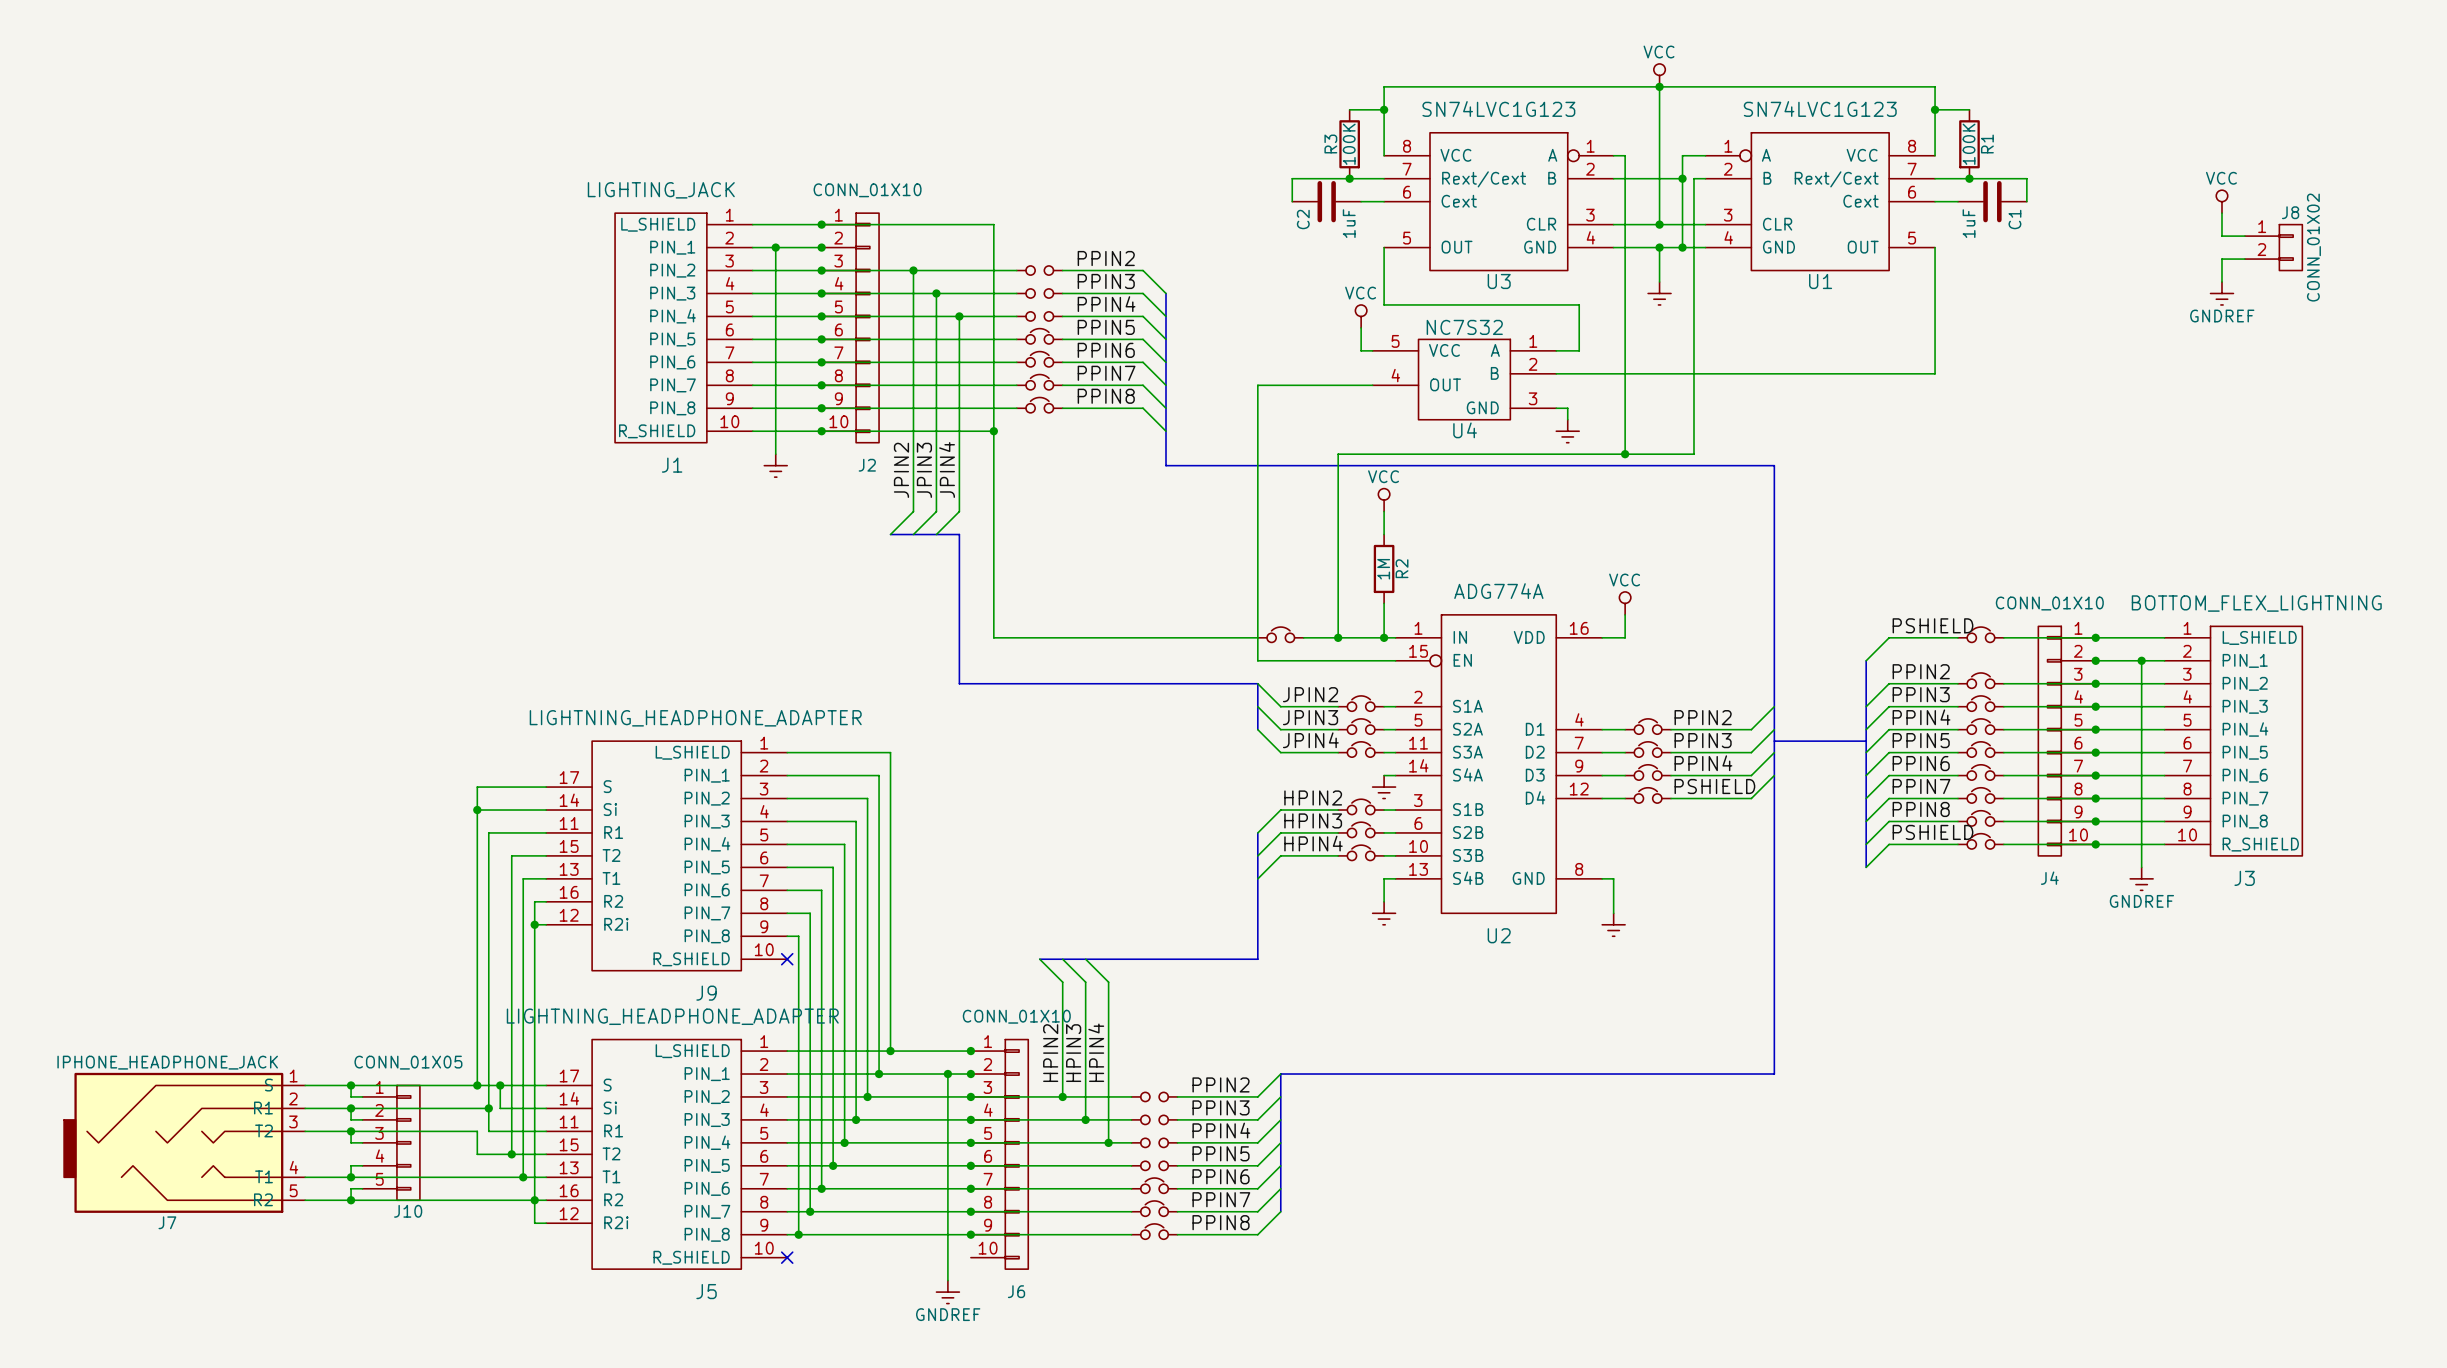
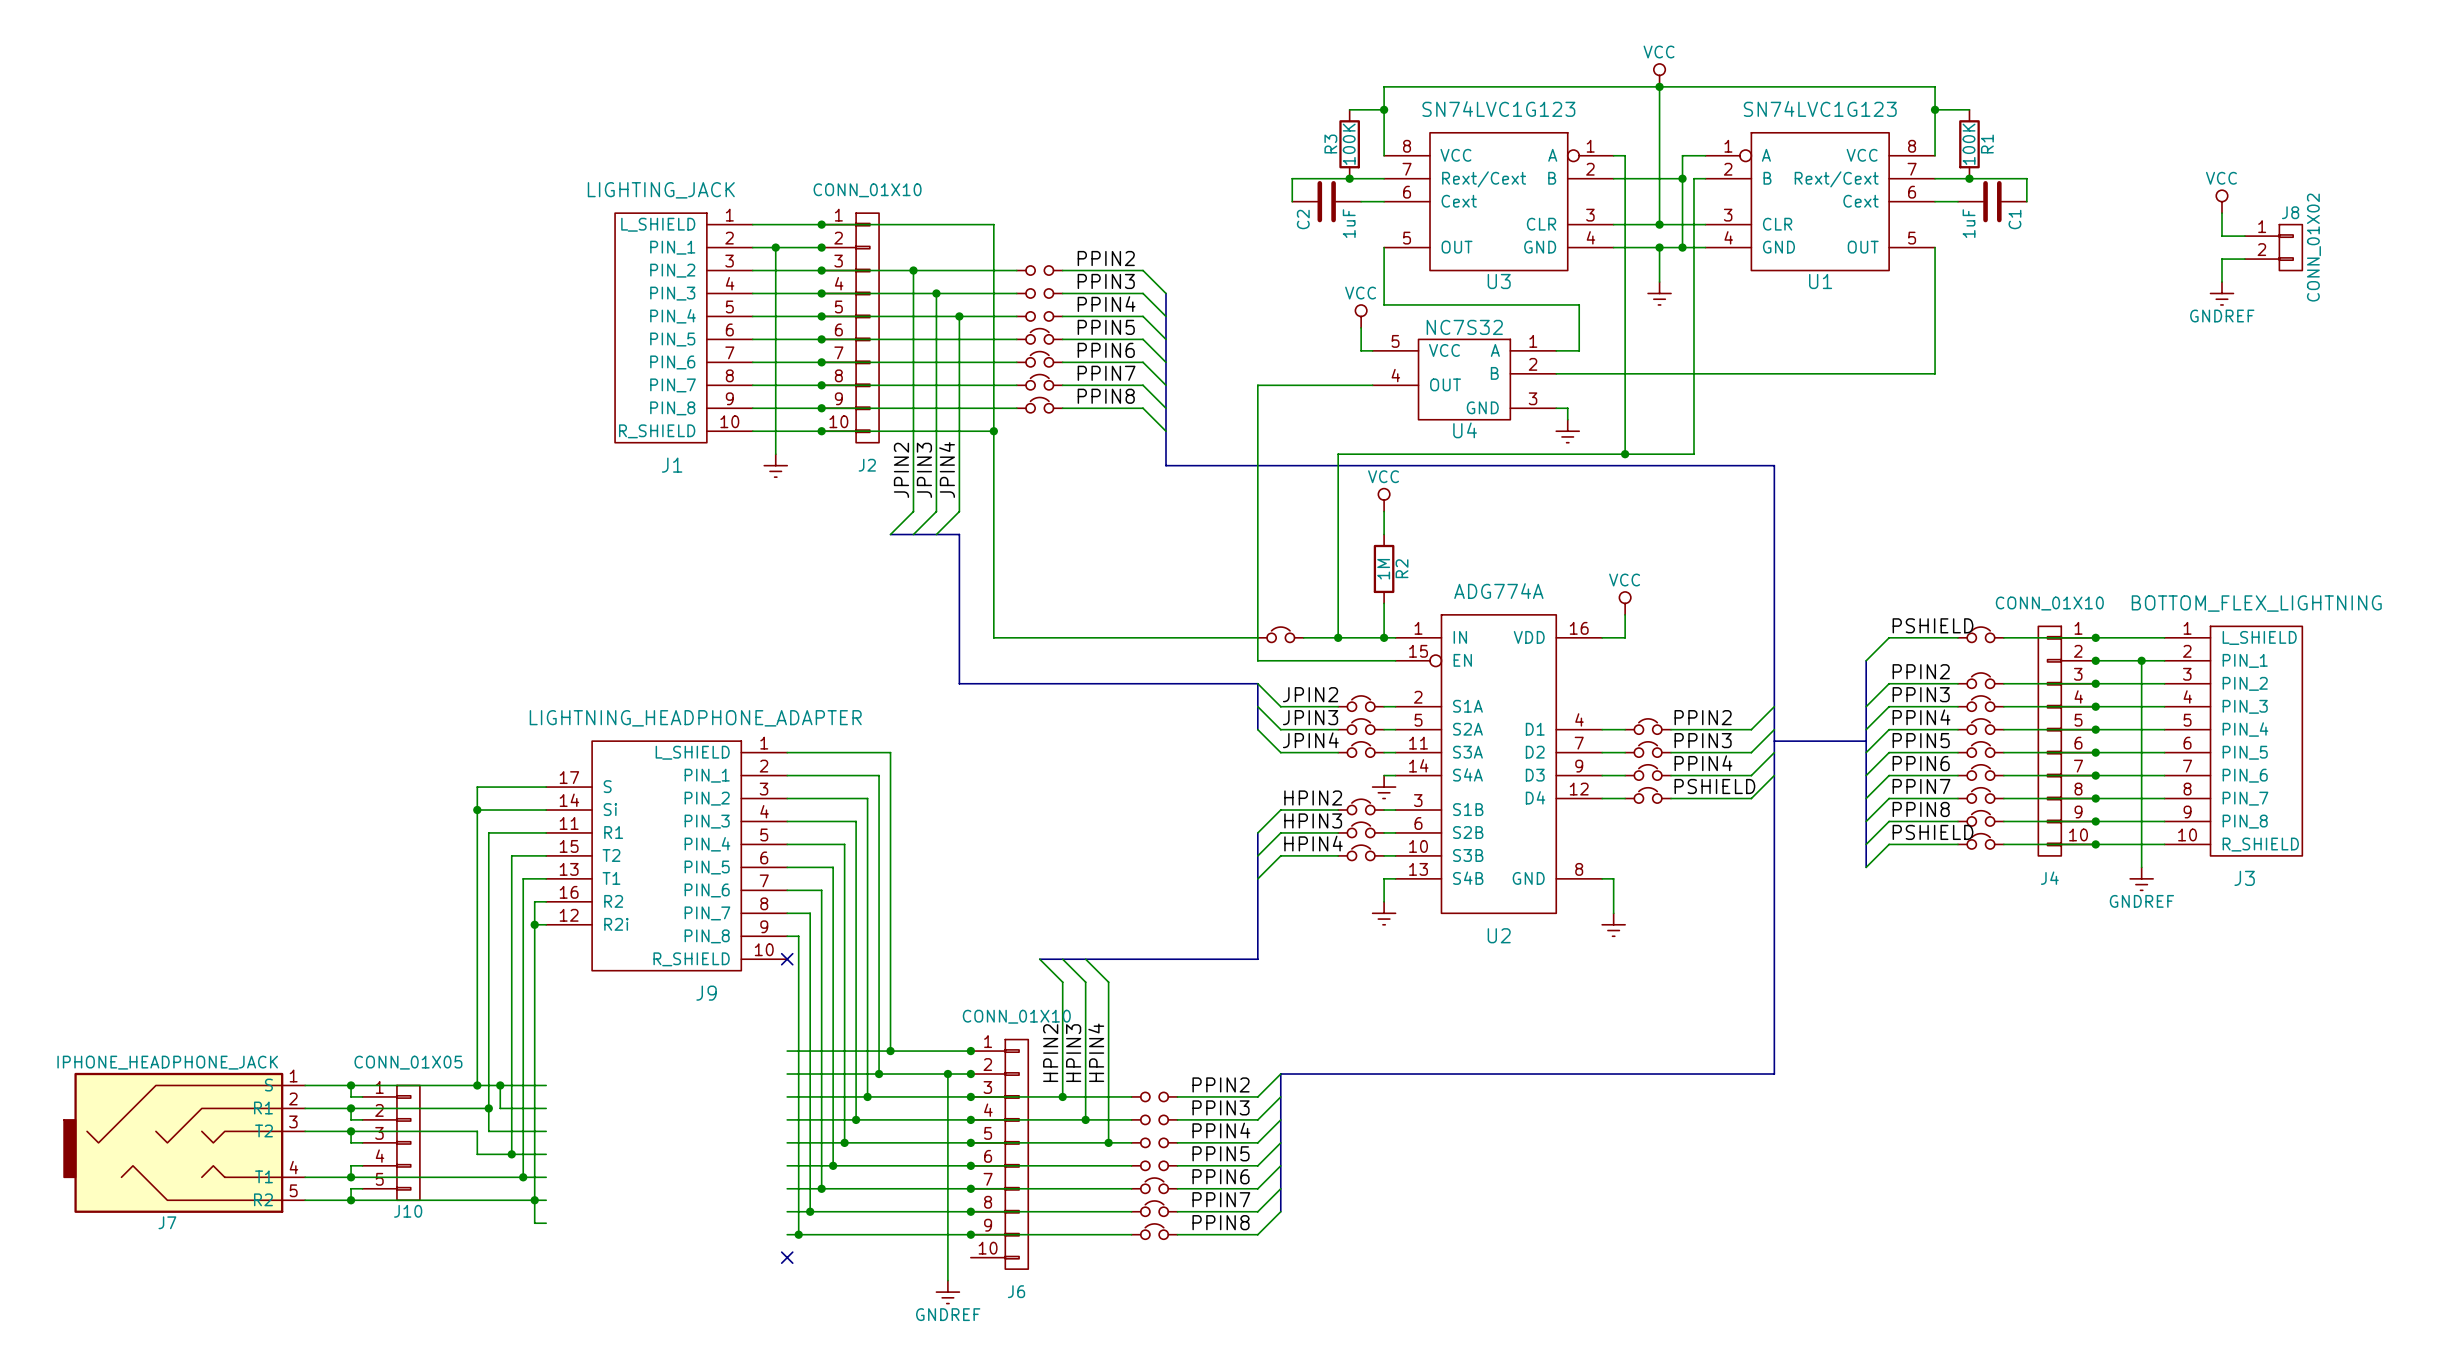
J5: LIGHTNING_HEADPHONE_ADAPTER (666, 1154) -> none

